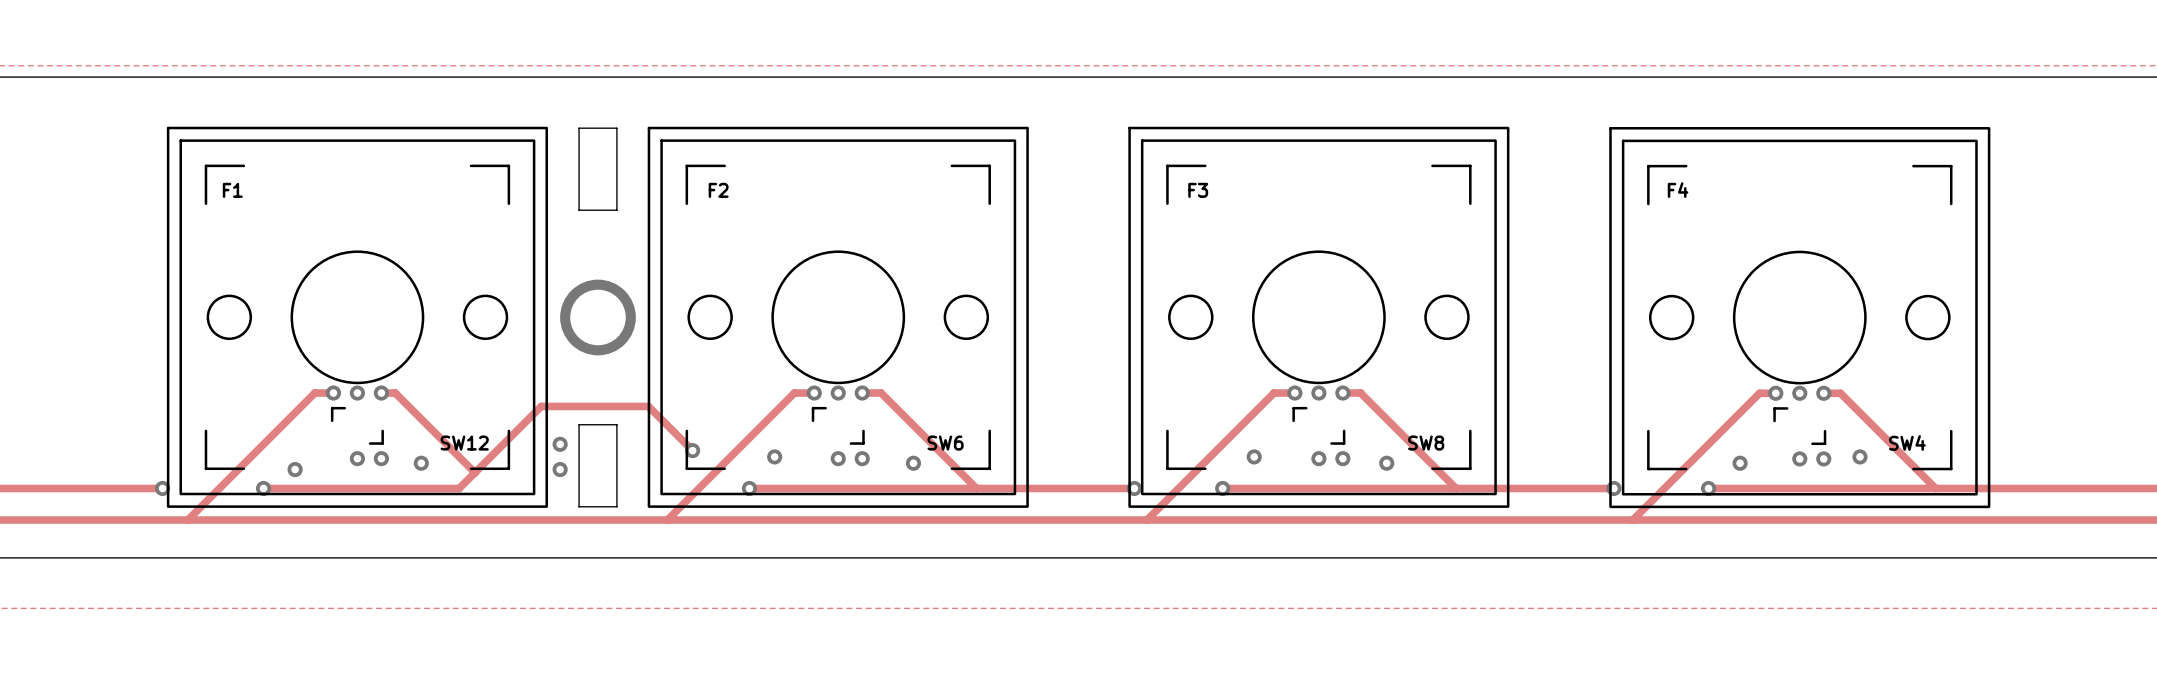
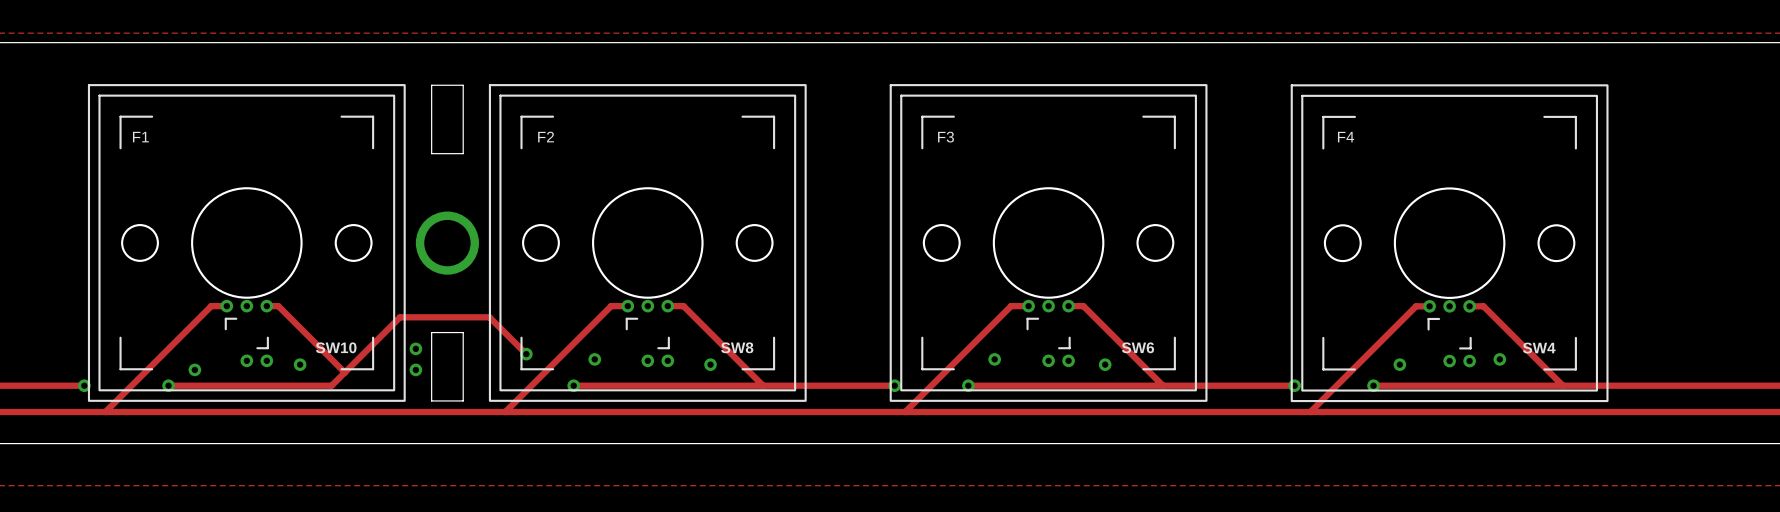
SW12 name: SW12 (464, 443) -> SW10 (336, 347)
SW6 name: SW6 (945, 443) -> SW8 (737, 347)
SW8 name: SW8 (1426, 443) -> SW6 (1137, 347)

